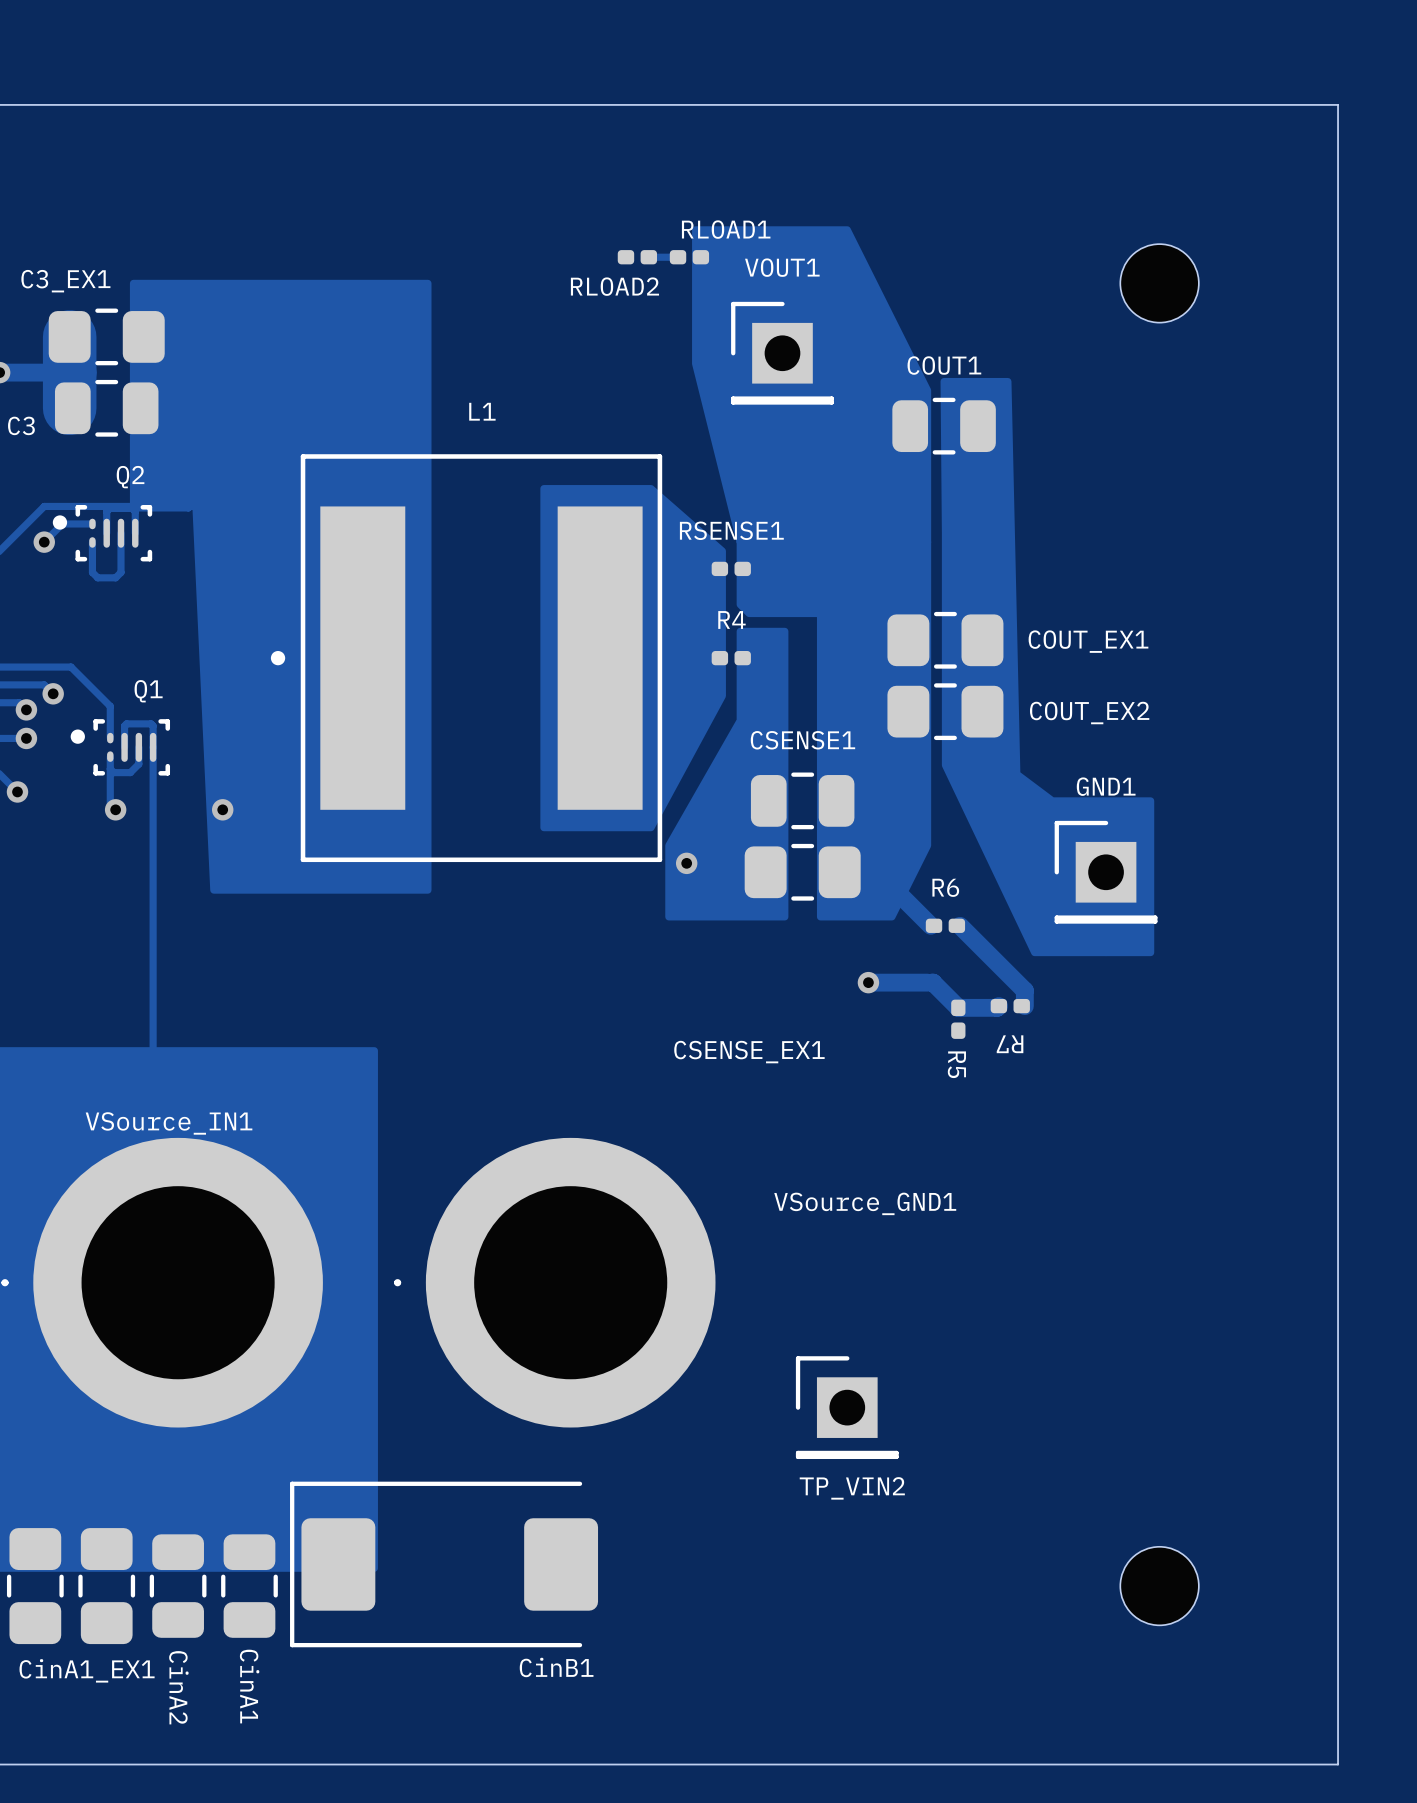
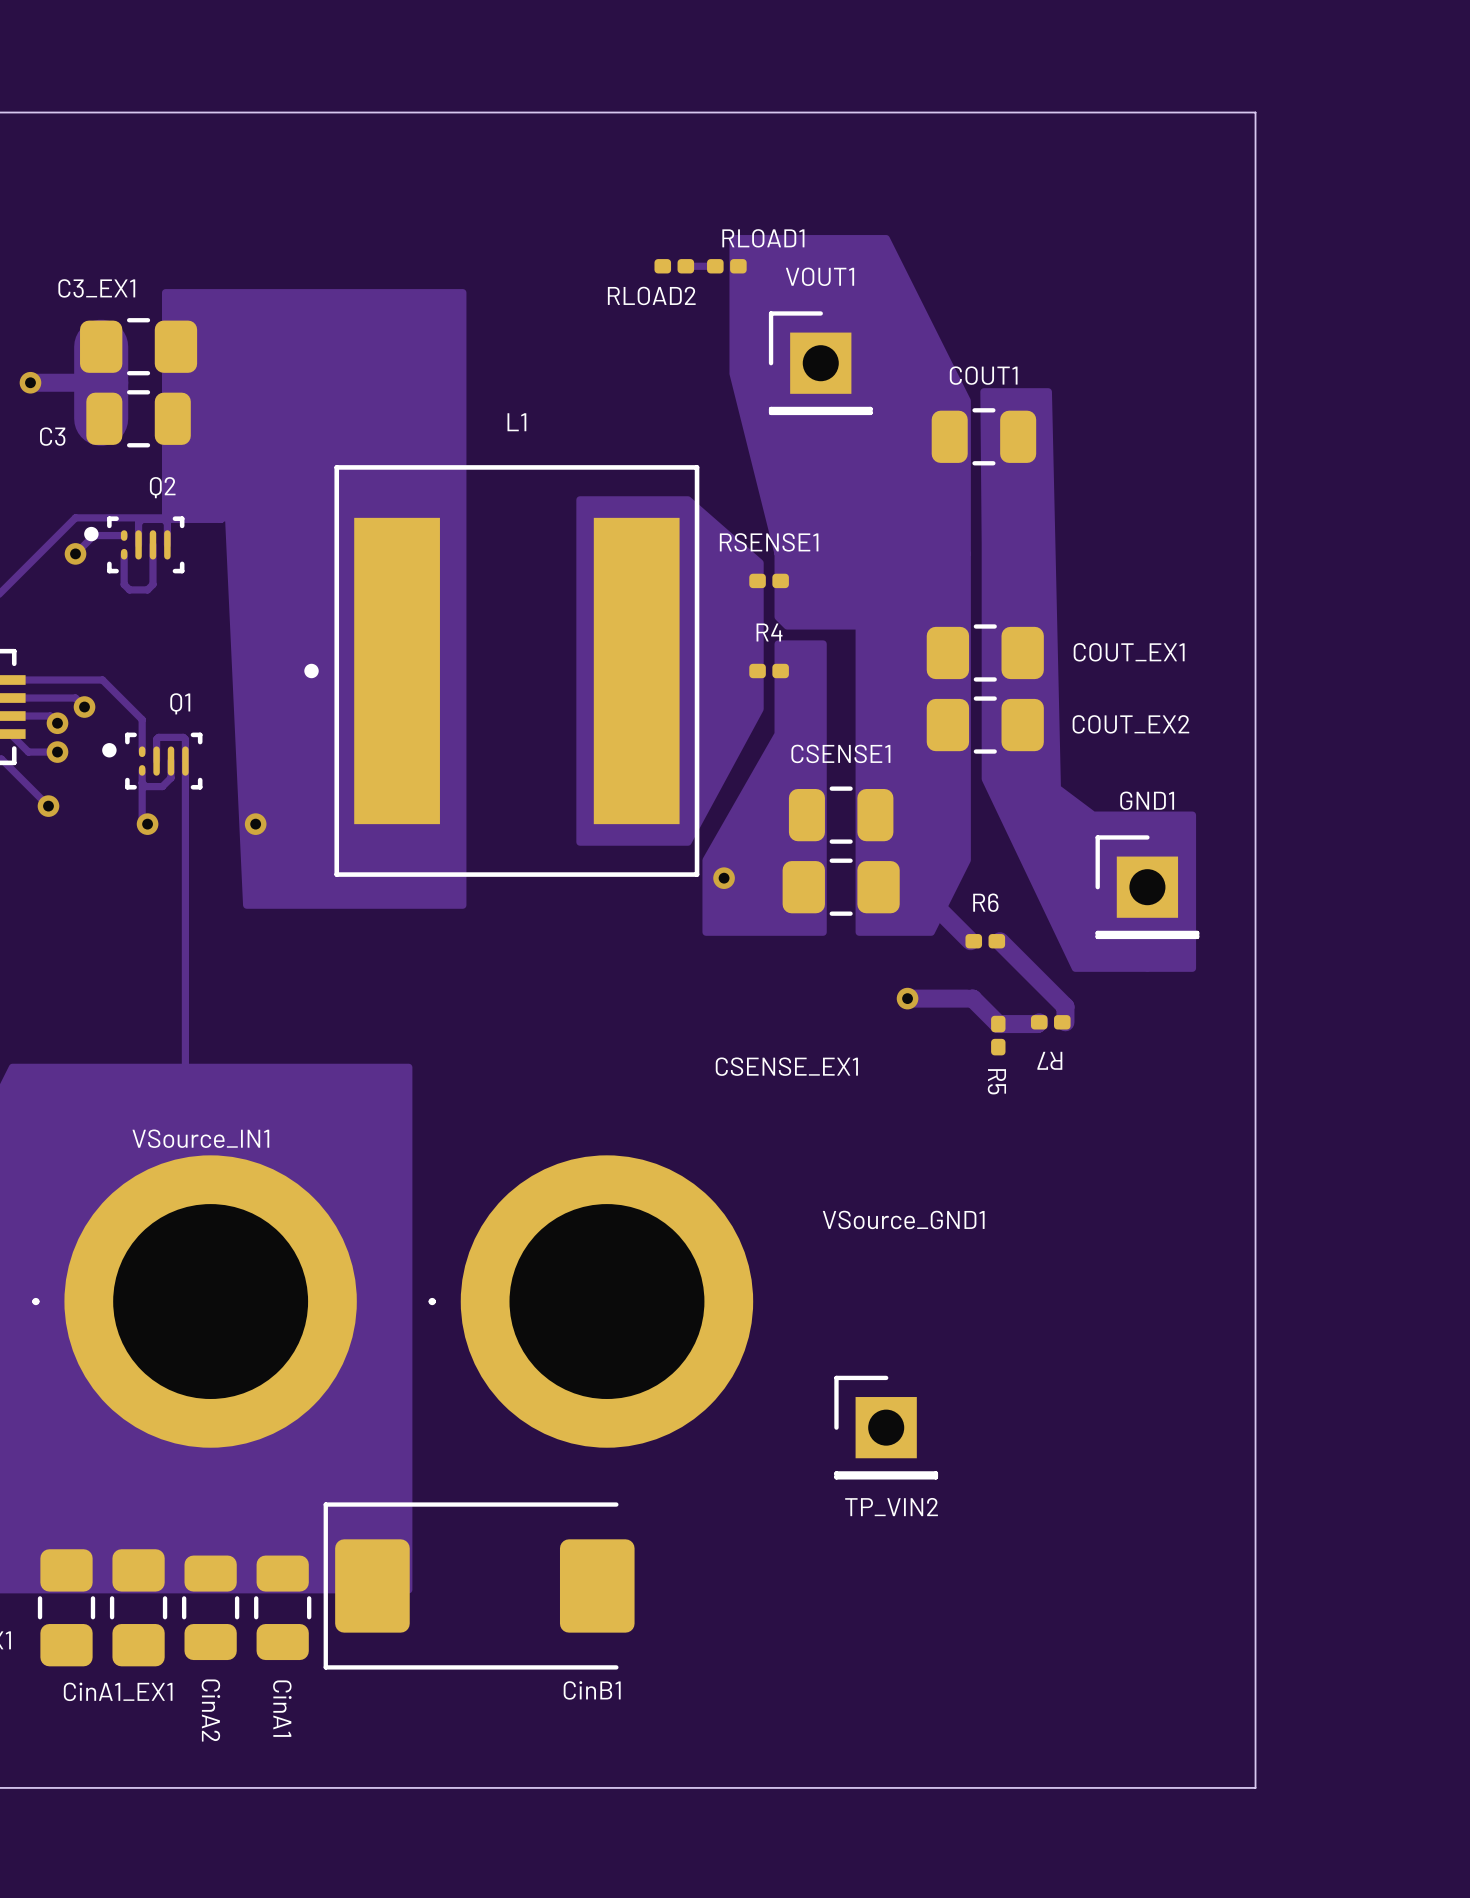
board edge: (1213, 104) (1338, 104) (1338, 1764) (1213, 1764) -> (1255, 112) (1255, 1787)
part: (1159, 283) -> none
part: (1159, 1586) -> none

